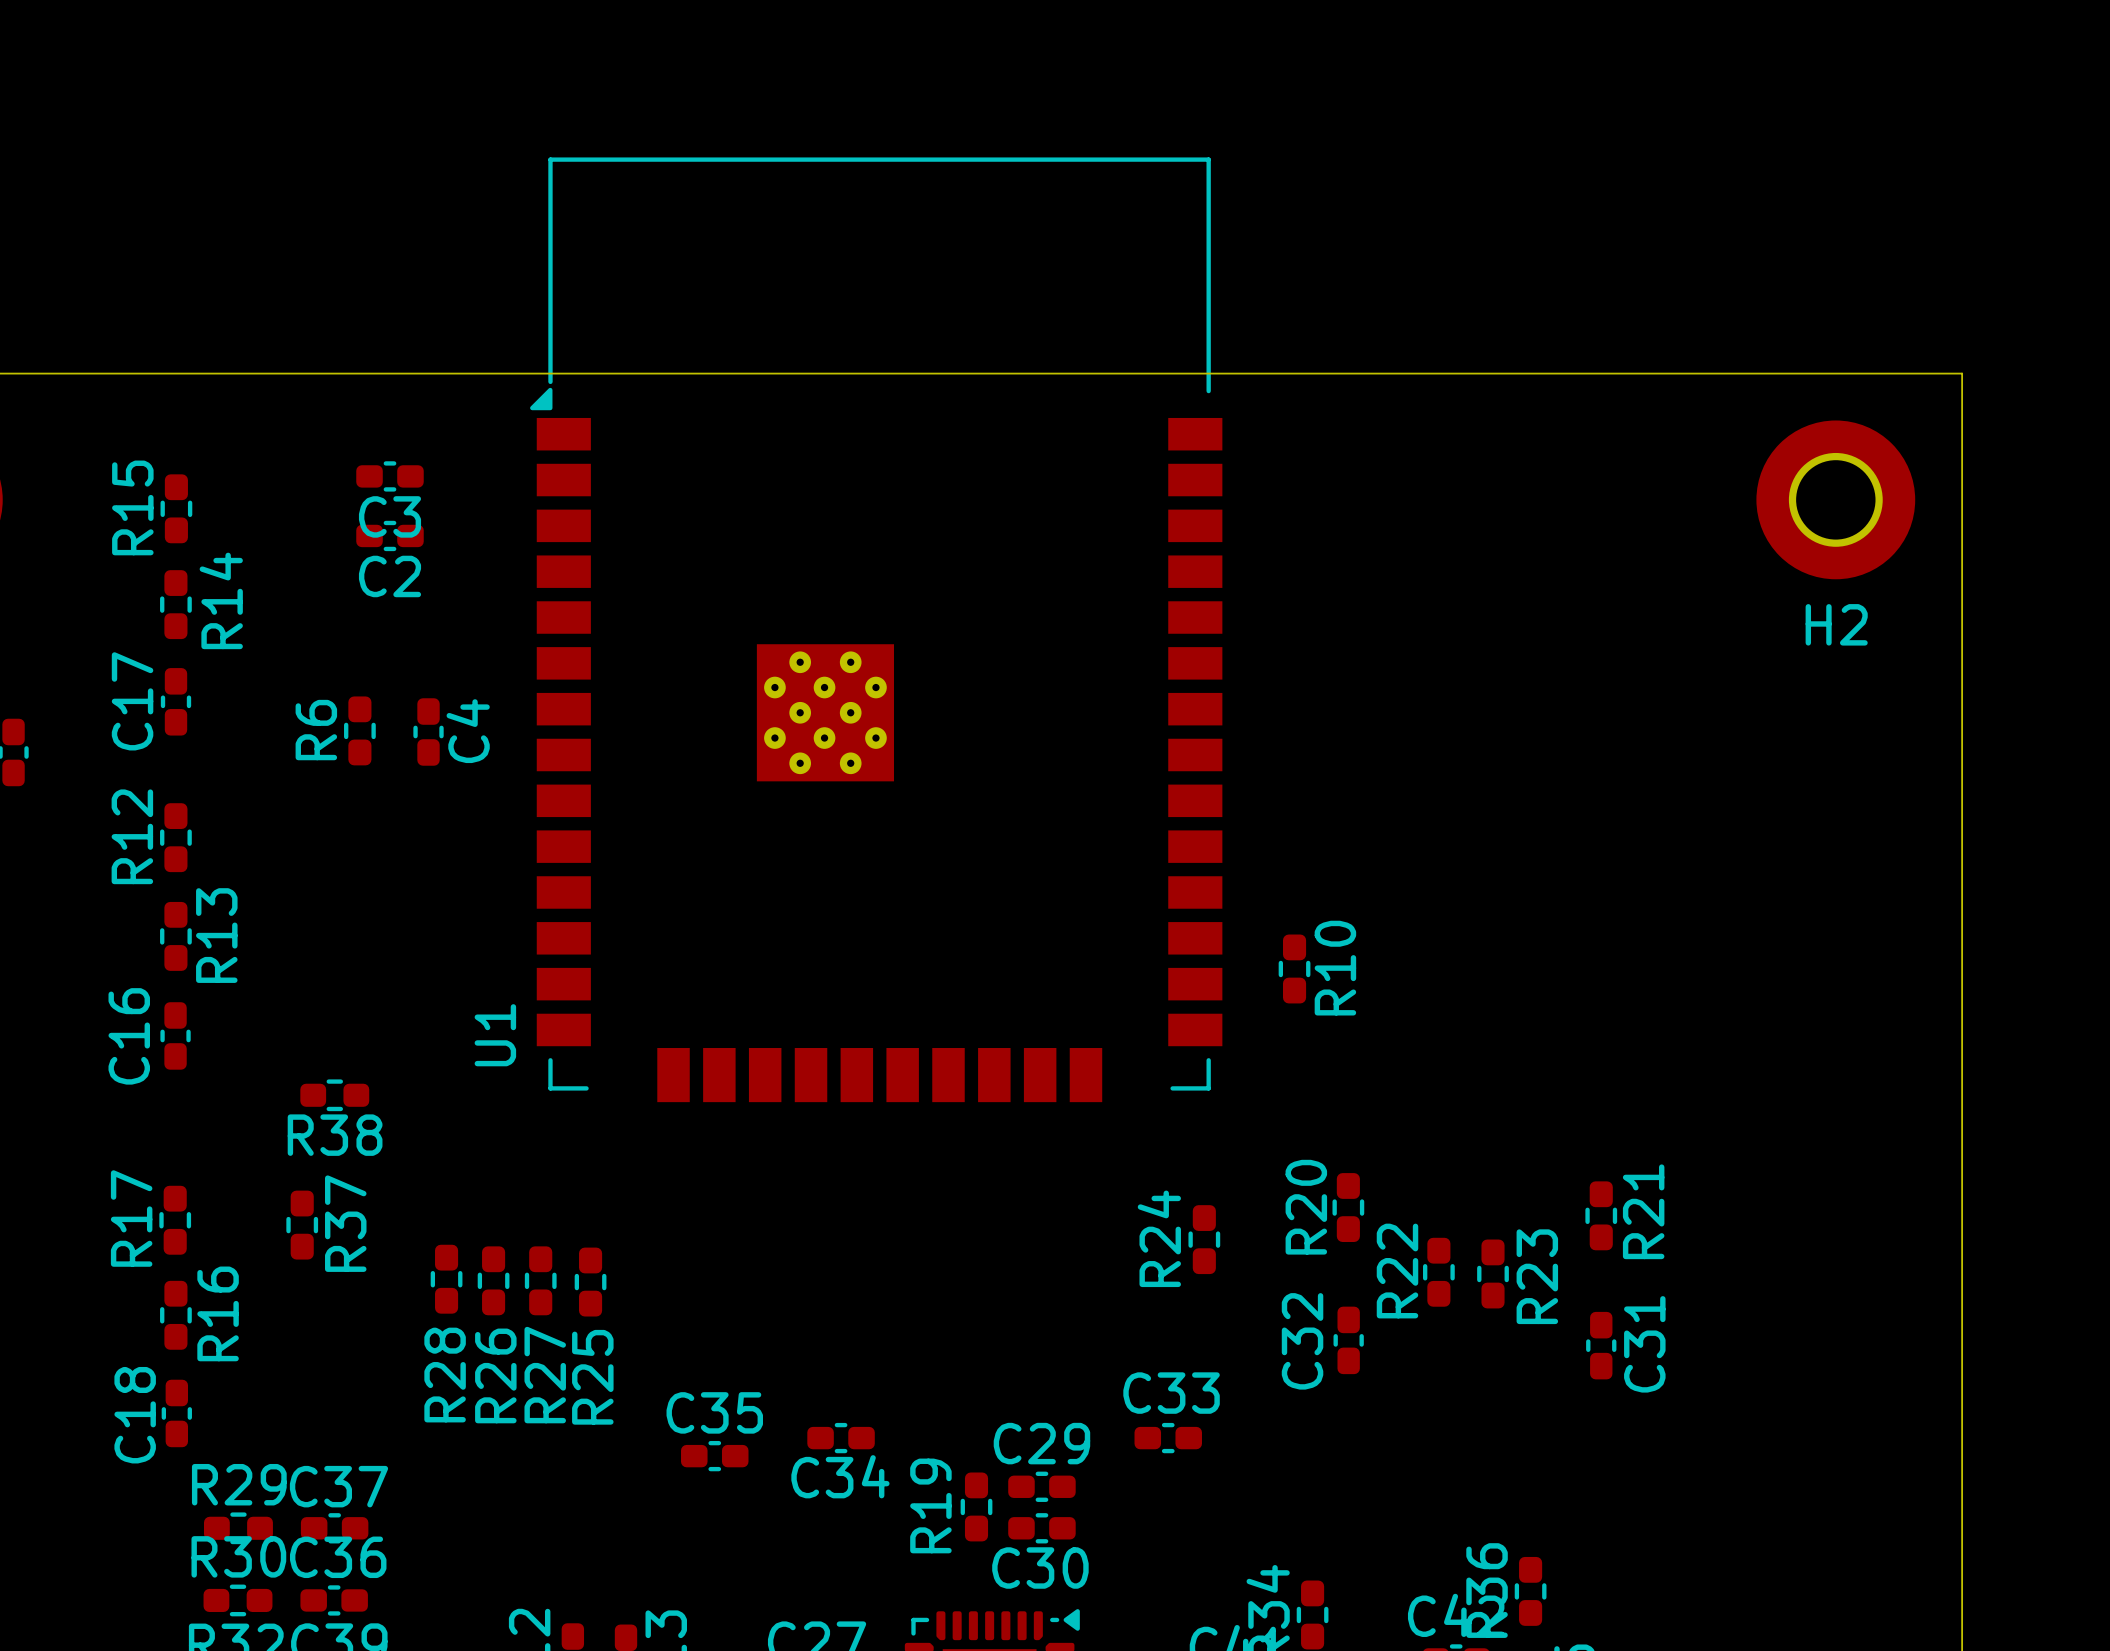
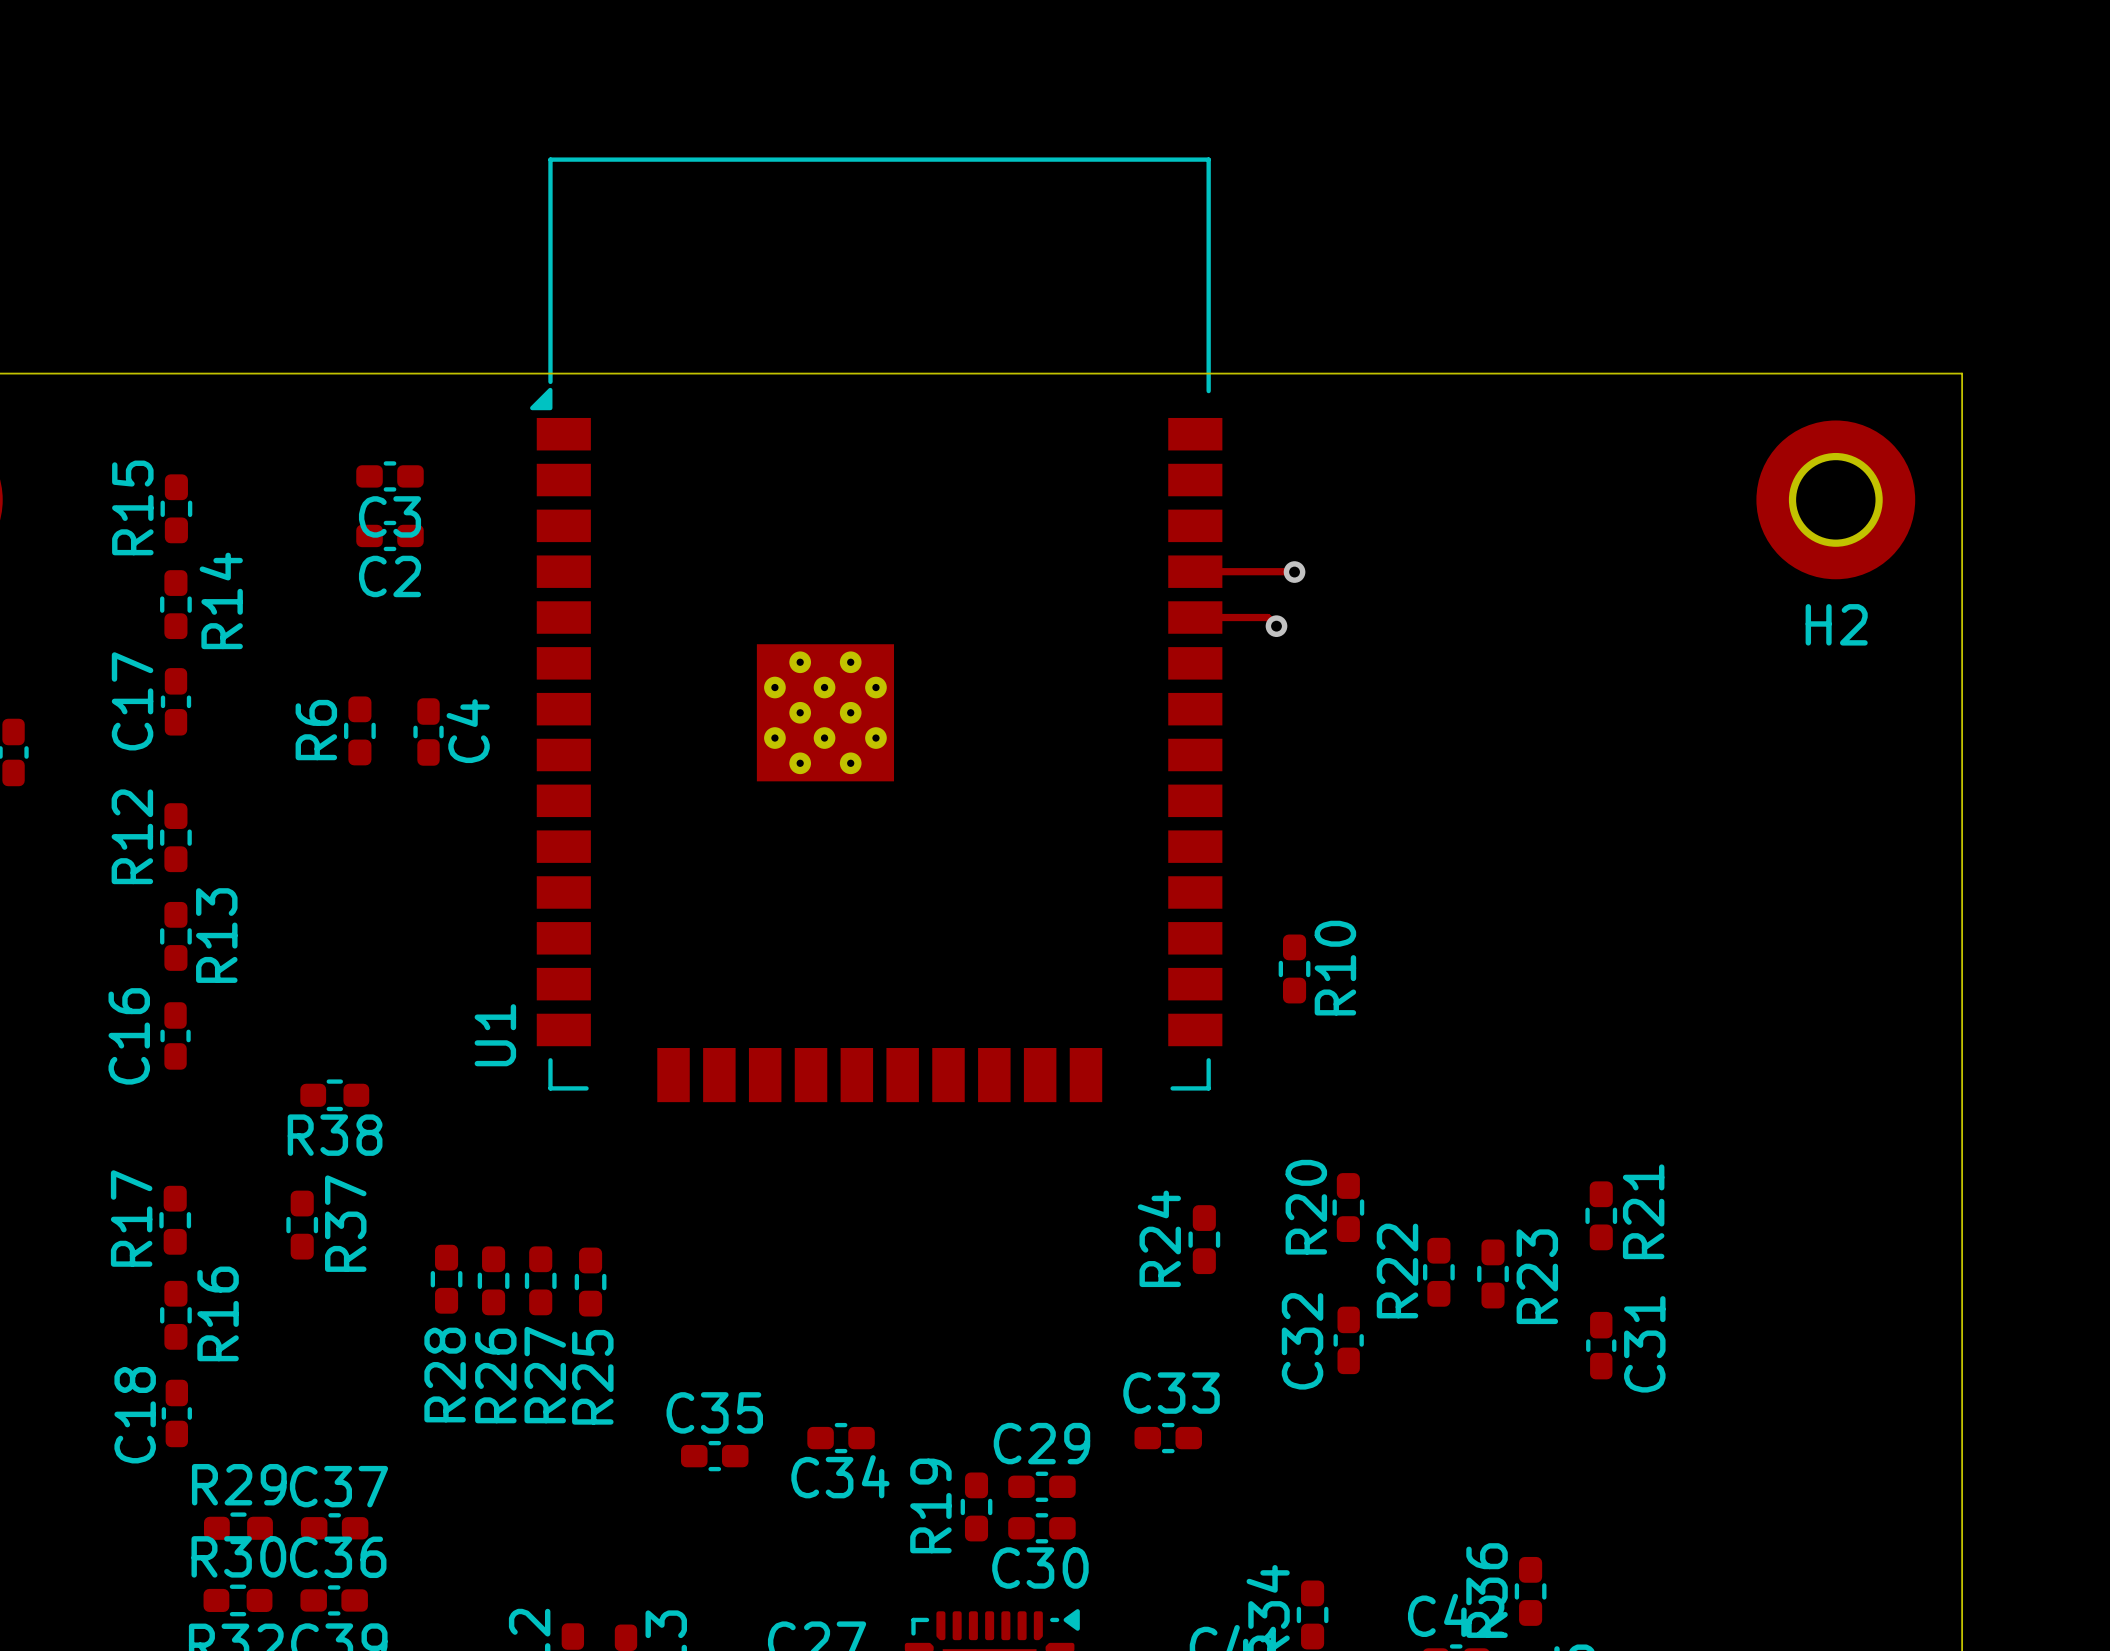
track: none -> (1195, 571) (1294, 571)
via: none -> (1294, 572)
track: none -> (1195, 617) (1267, 617) (1276, 626)
via: none -> (1276, 626)

